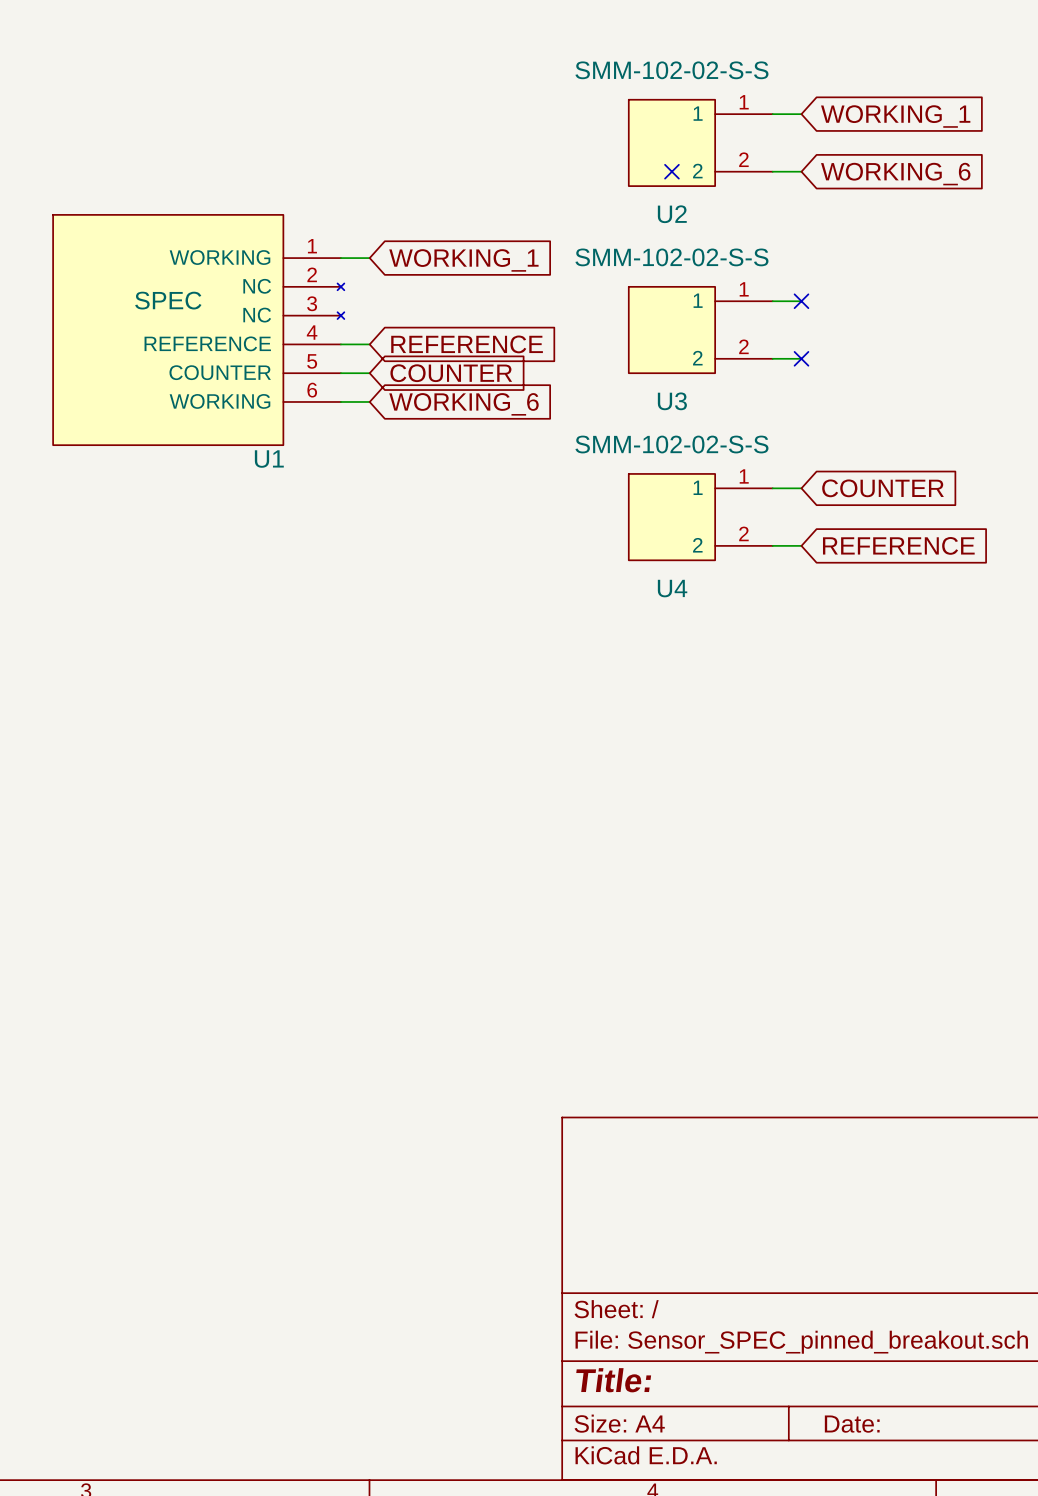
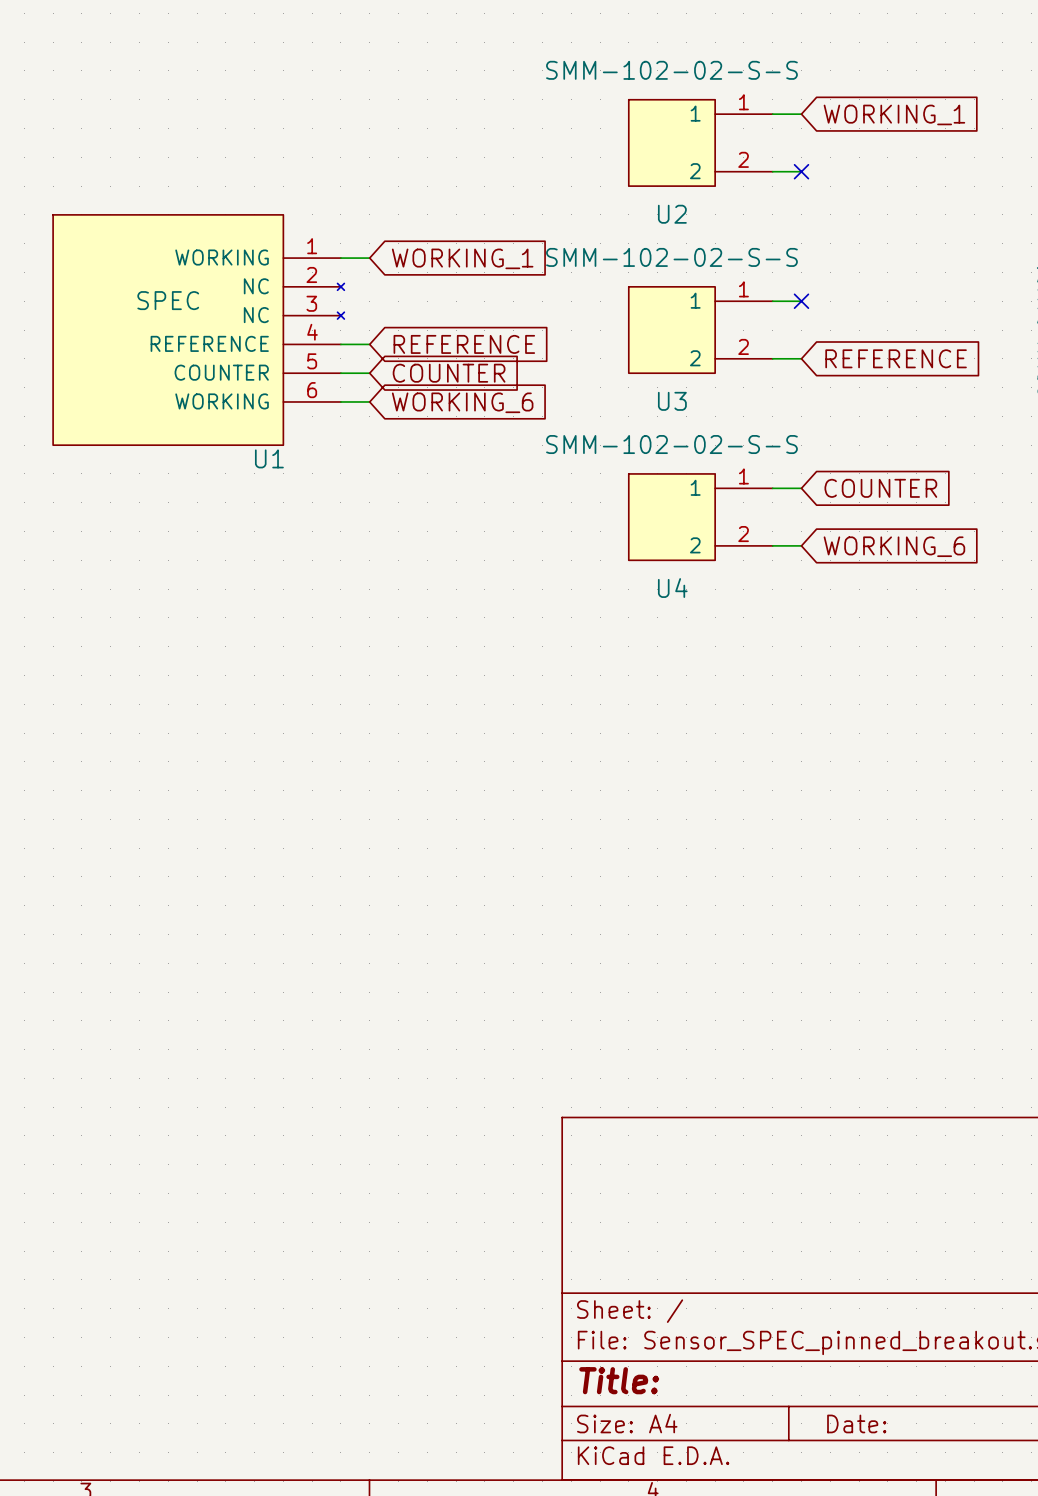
no-connect mark: (671, 171) -> none
no-connect mark: none -> (801, 171)
global label: WORKING_6 (895, 174) -> none
no-connect mark: (801, 358) -> none
global label: none -> REFERENCE (896, 358)
global label: REFERENCE (898, 545) -> WORKING_6 (894, 546)

